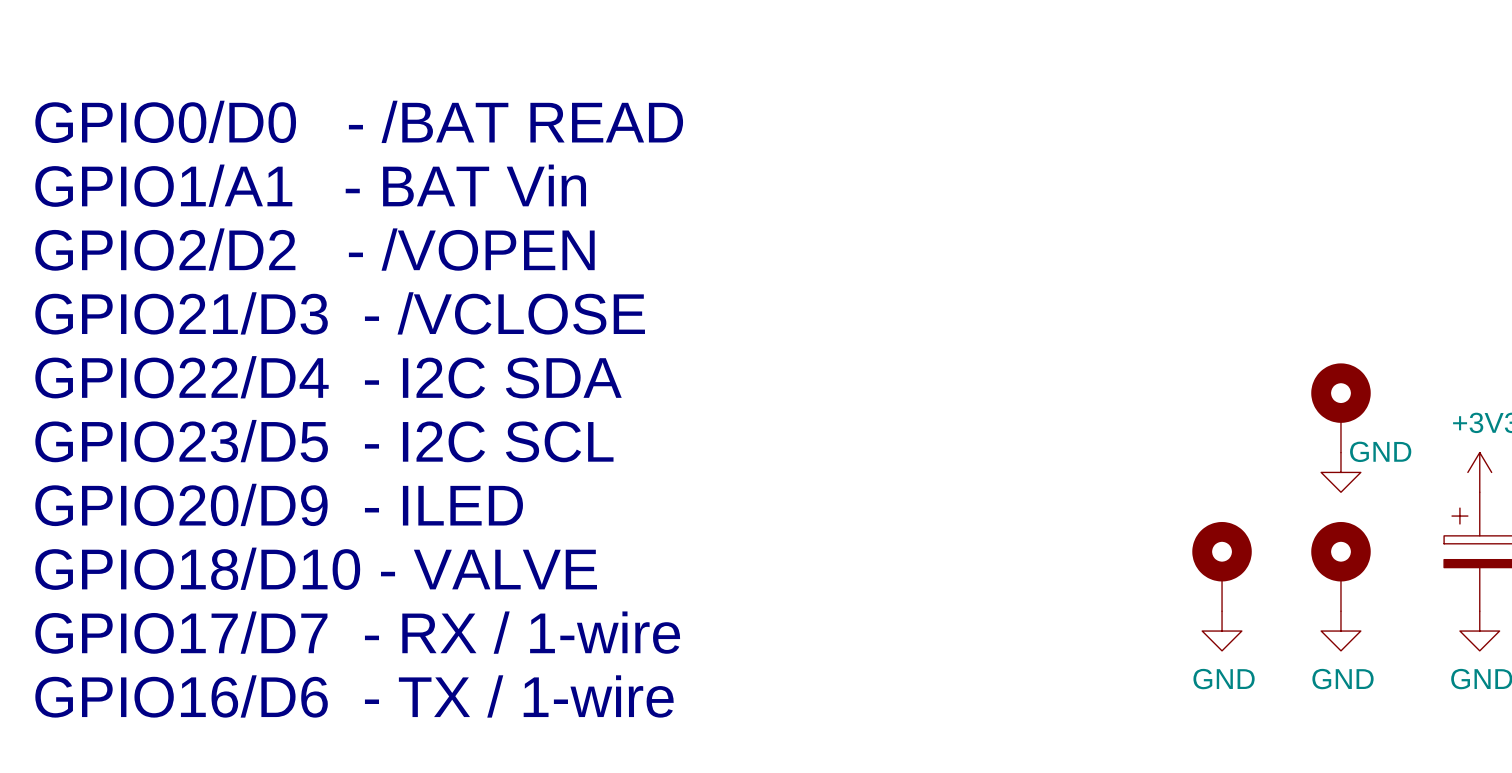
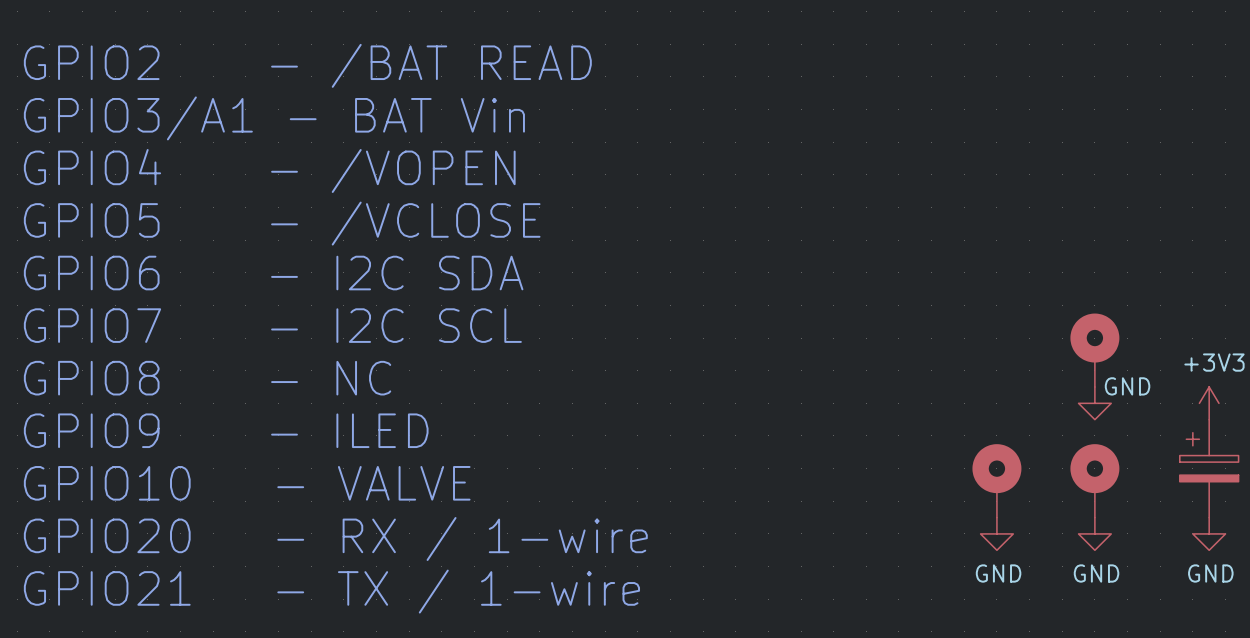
text: none -> GPIO2 - /BAT READ (307, 65)
text: GPIO0/D0 - /BAT READ (359, 121) -> GPIO3/A1 - BAT Vin (274, 118)
text: GPIO1/A1 - BAT Vin (310, 185) -> GPIO4 - /VOPEN (269, 170)
text: GPIO2/D2 - /VOPEN (314, 249) -> GPIO5 - /VCLOSE (282, 223)
text: GPIO21/D3 - /VCLOSE (340, 313) -> GPIO6 - I2C SDA (273, 273)
text: GPIO22/D4 - I2C SDA (328, 377) -> GPIO7 - I2C SCL (272, 325)
text: GPIO23/D5 - I2C SCL (324, 441) -> GPIO8 - NC (207, 378)
text: GPIO20/D9 - ILED (279, 504) -> GPIO9 - ILED (226, 430)
text: GPIO18/D10 - VALVE (316, 568) -> GPIO10 - VALVE (247, 483)
text: GPIO17/D7 - RX / 1-wire (357, 632) -> GPIO20 - RX / 1-wire (335, 538)
text: GPIO16/D6 - TX / 1-wire (354, 696) -> GPIO21 - TX / 1-wire (331, 591)

